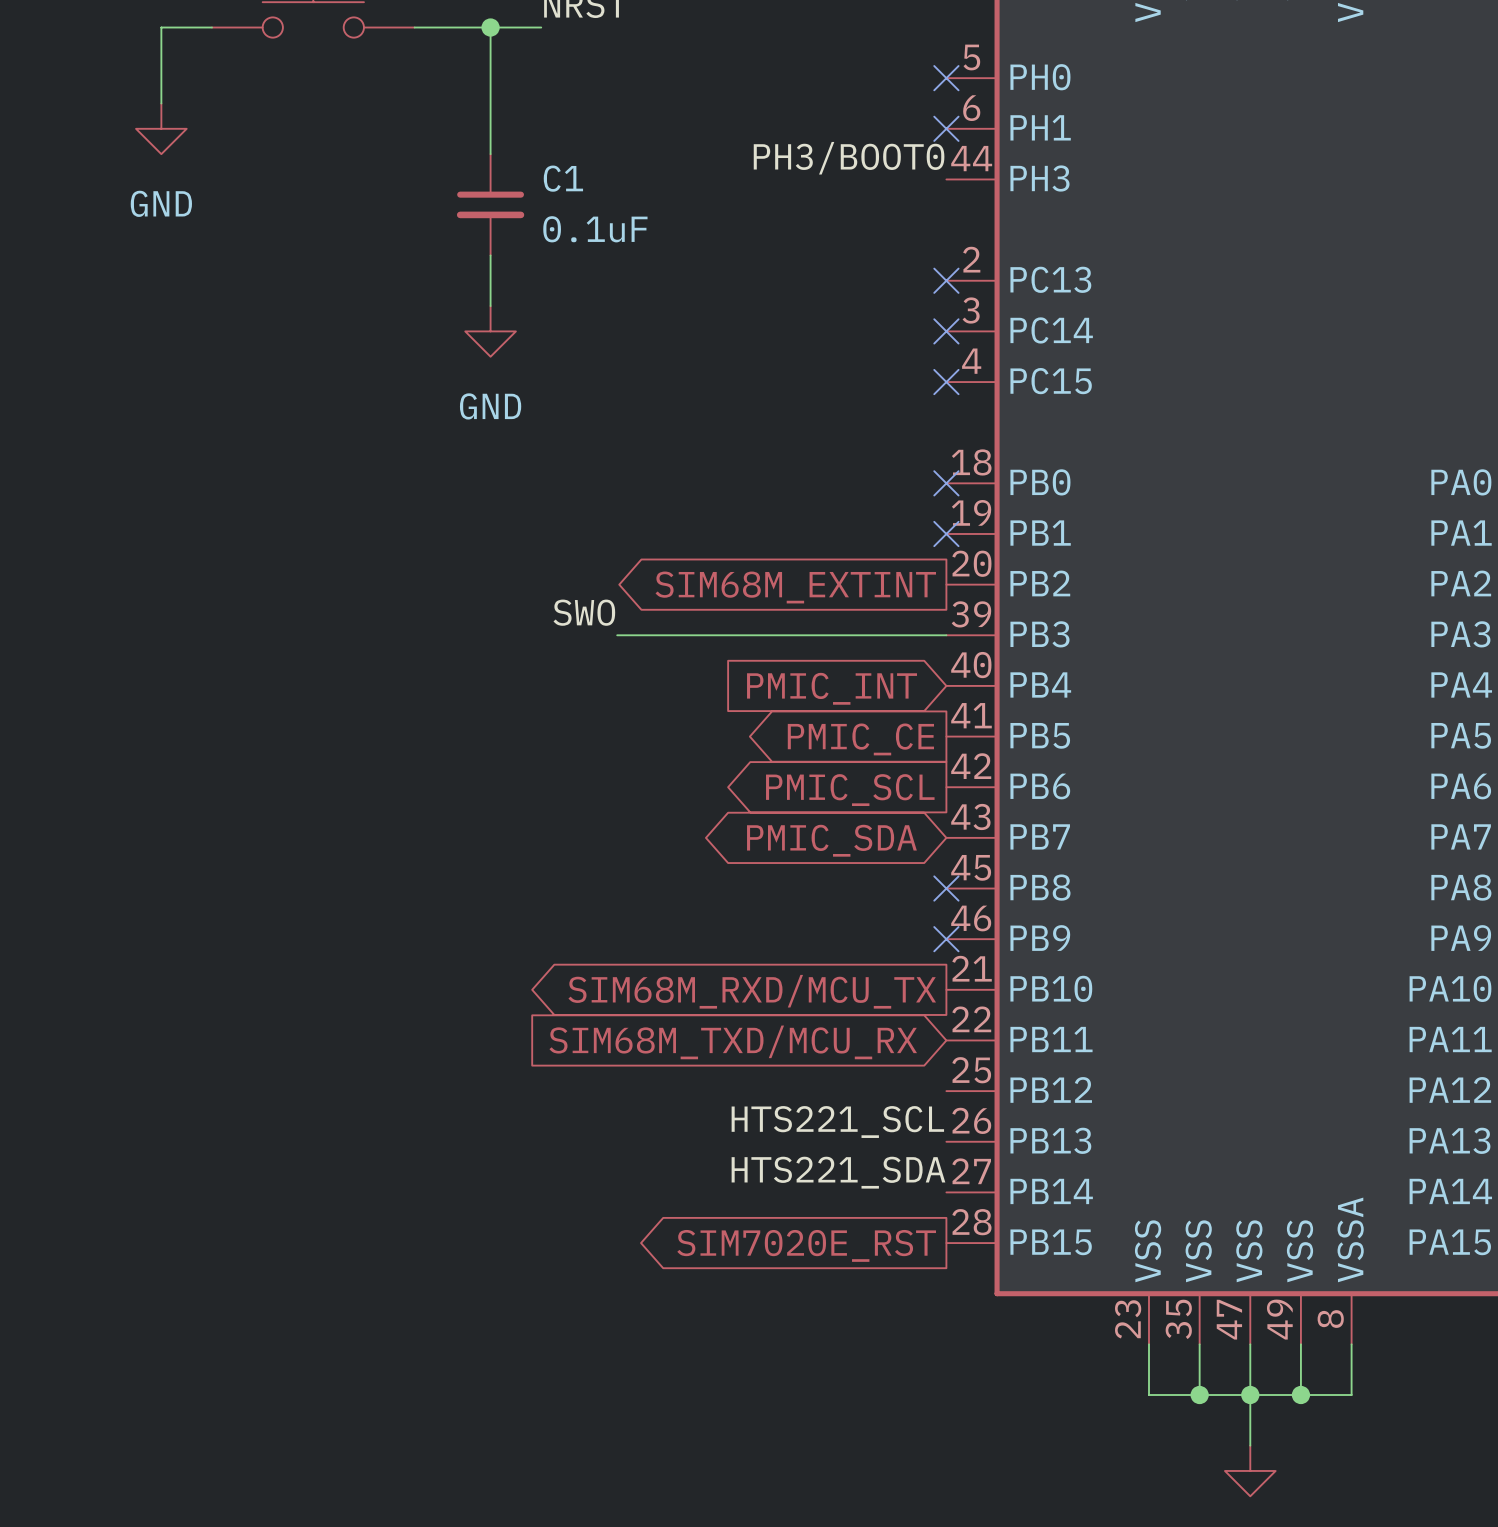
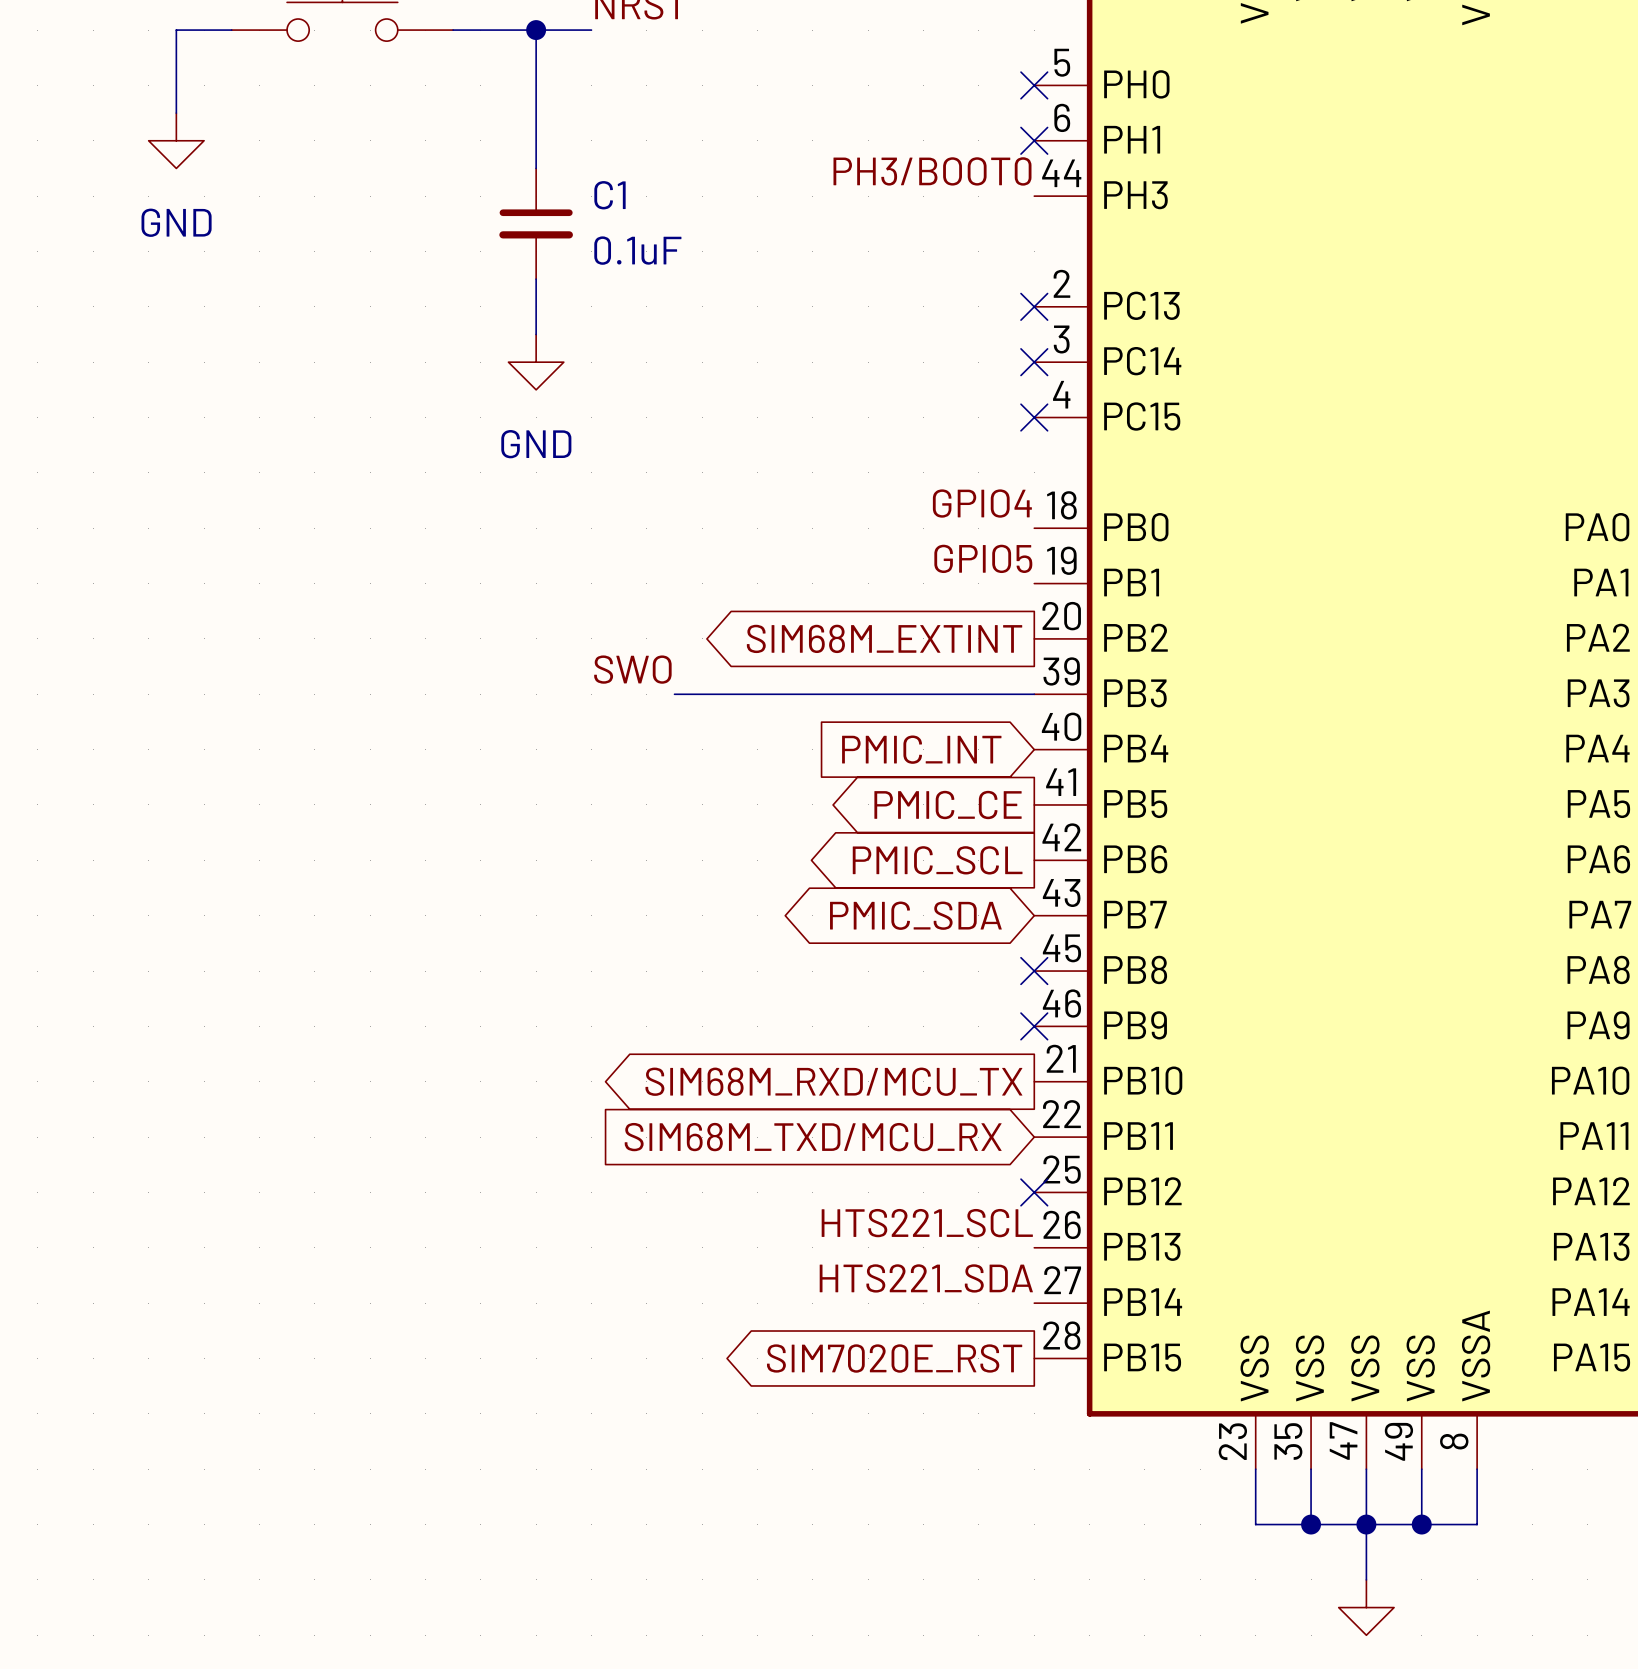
label: none -> GPIO4 (982, 503)
no-connect mark: (946, 483) -> none
label: none -> GPIO5 (983, 558)
no-connect mark: (946, 533) -> none
no-connect mark: none -> (1034, 1192)

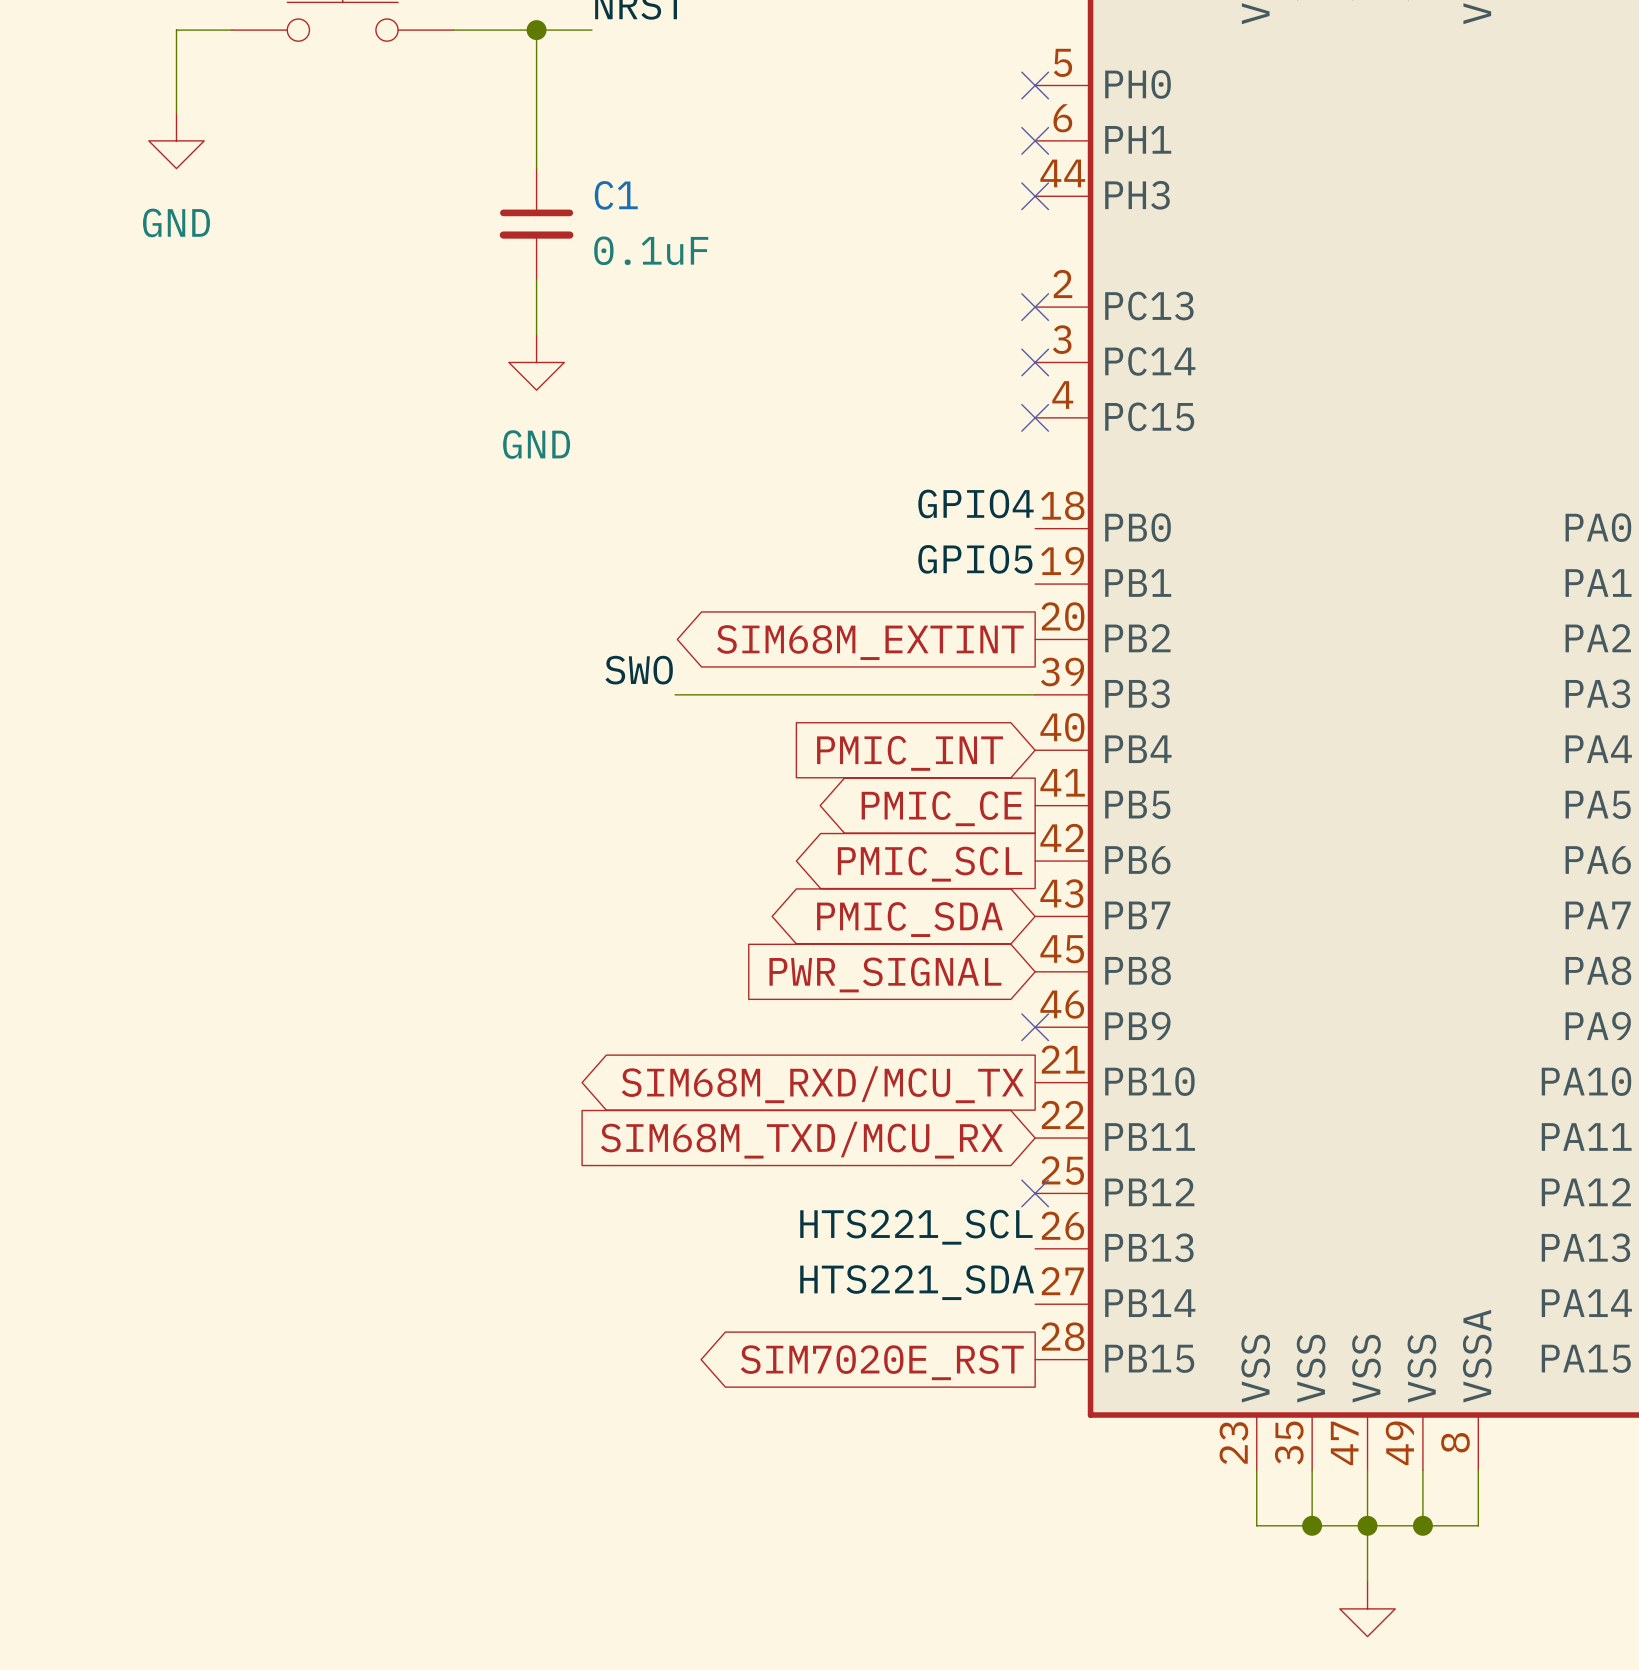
label: PH3/BOOT0 (932, 171) -> none
no-connect mark: none -> (1035, 196)
global label: none -> PWR_SIGNAL (885, 974)
no-connect mark: (1034, 971) -> none

